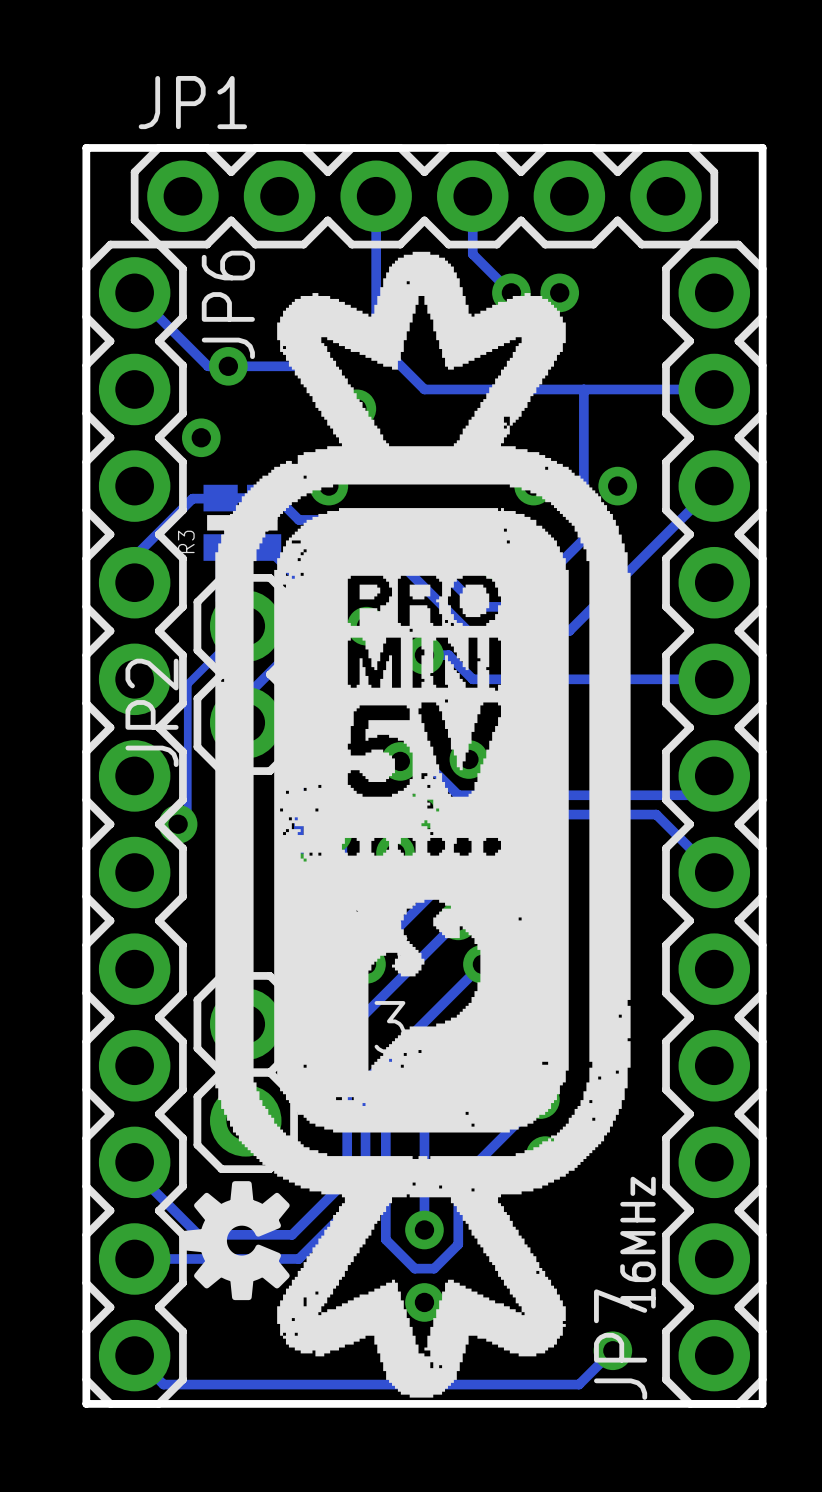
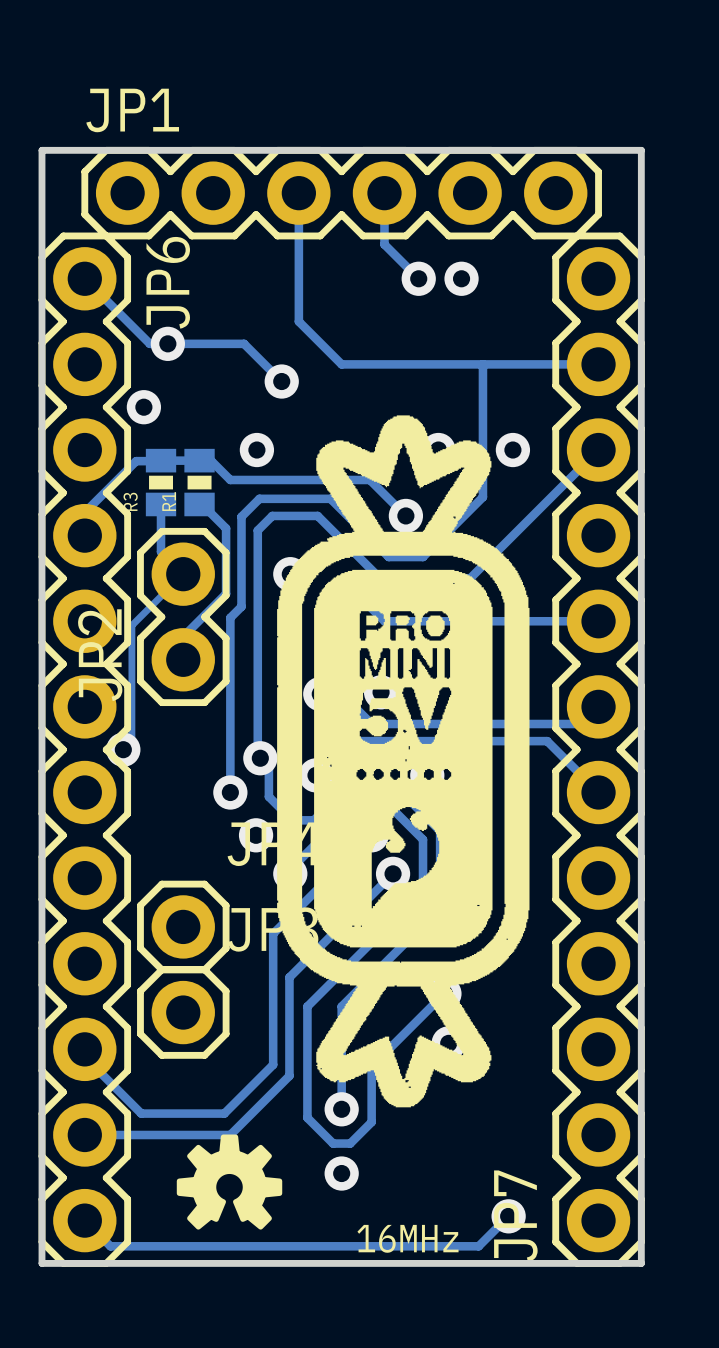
drawing: [182, 251, 631, 1398] -> none
drawing: none -> [176, 415, 530, 1230]
text rotation: 0° (637, 1242) -> 90° clockwise (407, 1238)
text position: 16MHz (637, 1242) -> 16MHz (407, 1238)

